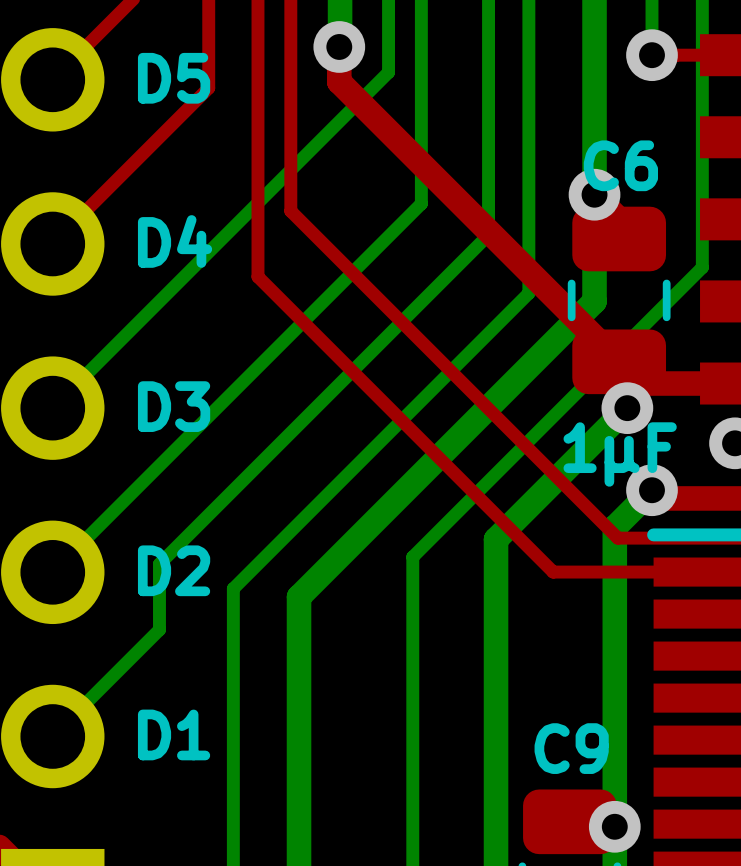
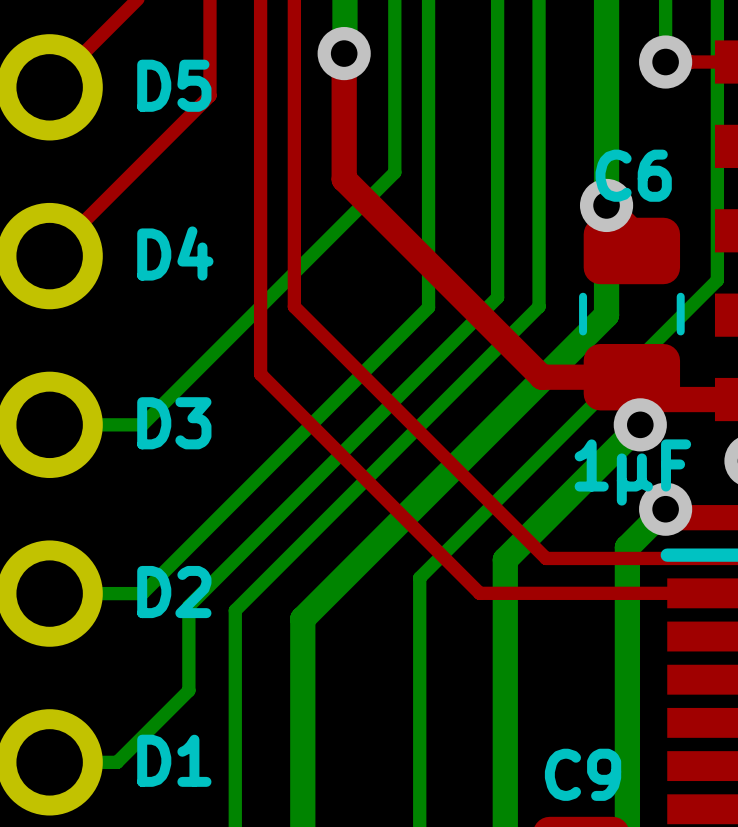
bottom track: (388, 72) (52, 408) -> (394, 79) (394, 172) (142, 424) (49, 424)
top track: (339, 81) (619, 361) -> (344, 89) (344, 179) (542, 377) (631, 377)
bottom track: (421, 203) (52, 572) -> (428, 214) (428, 307) (142, 593) (49, 593)
top track: (290, 211) (617, 538) -> (294, 222) (294, 306) (546, 558) (630, 558)
bottom track: (488, 235) (159, 564) (159, 629) (52, 736) -> (497, 246) (497, 297) (188, 606) (188, 690) (117, 762) (49, 762)
top track: (257, 276) (553, 572) -> (260, 289) (260, 374) (479, 593) (564, 593)

